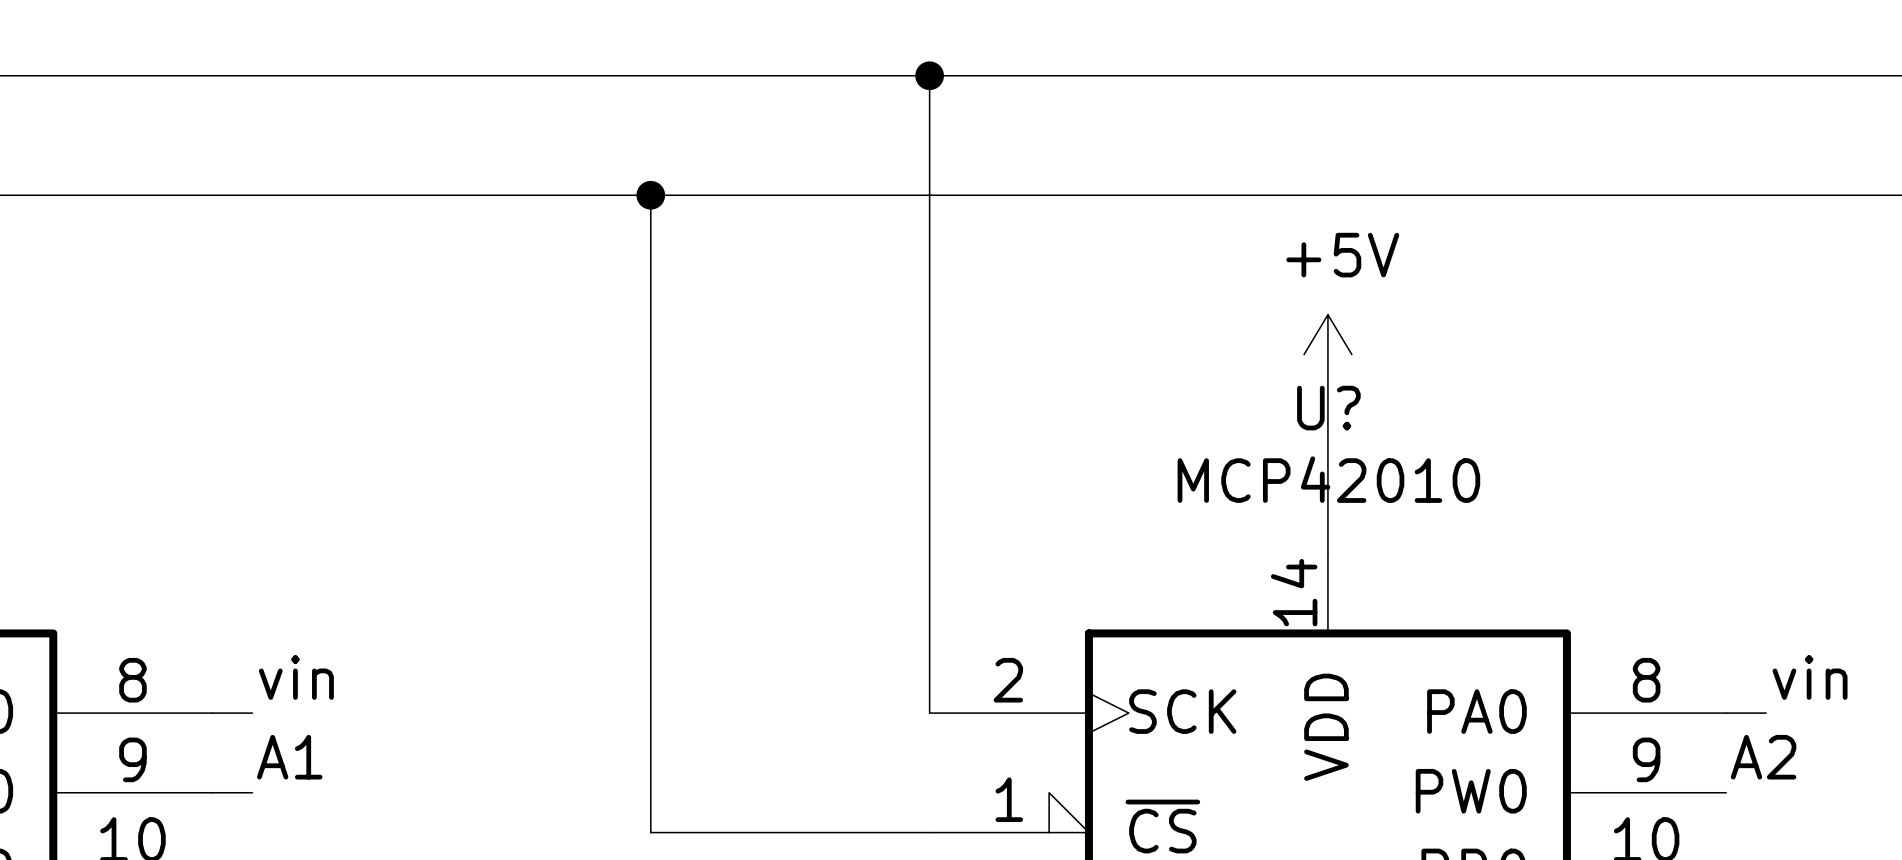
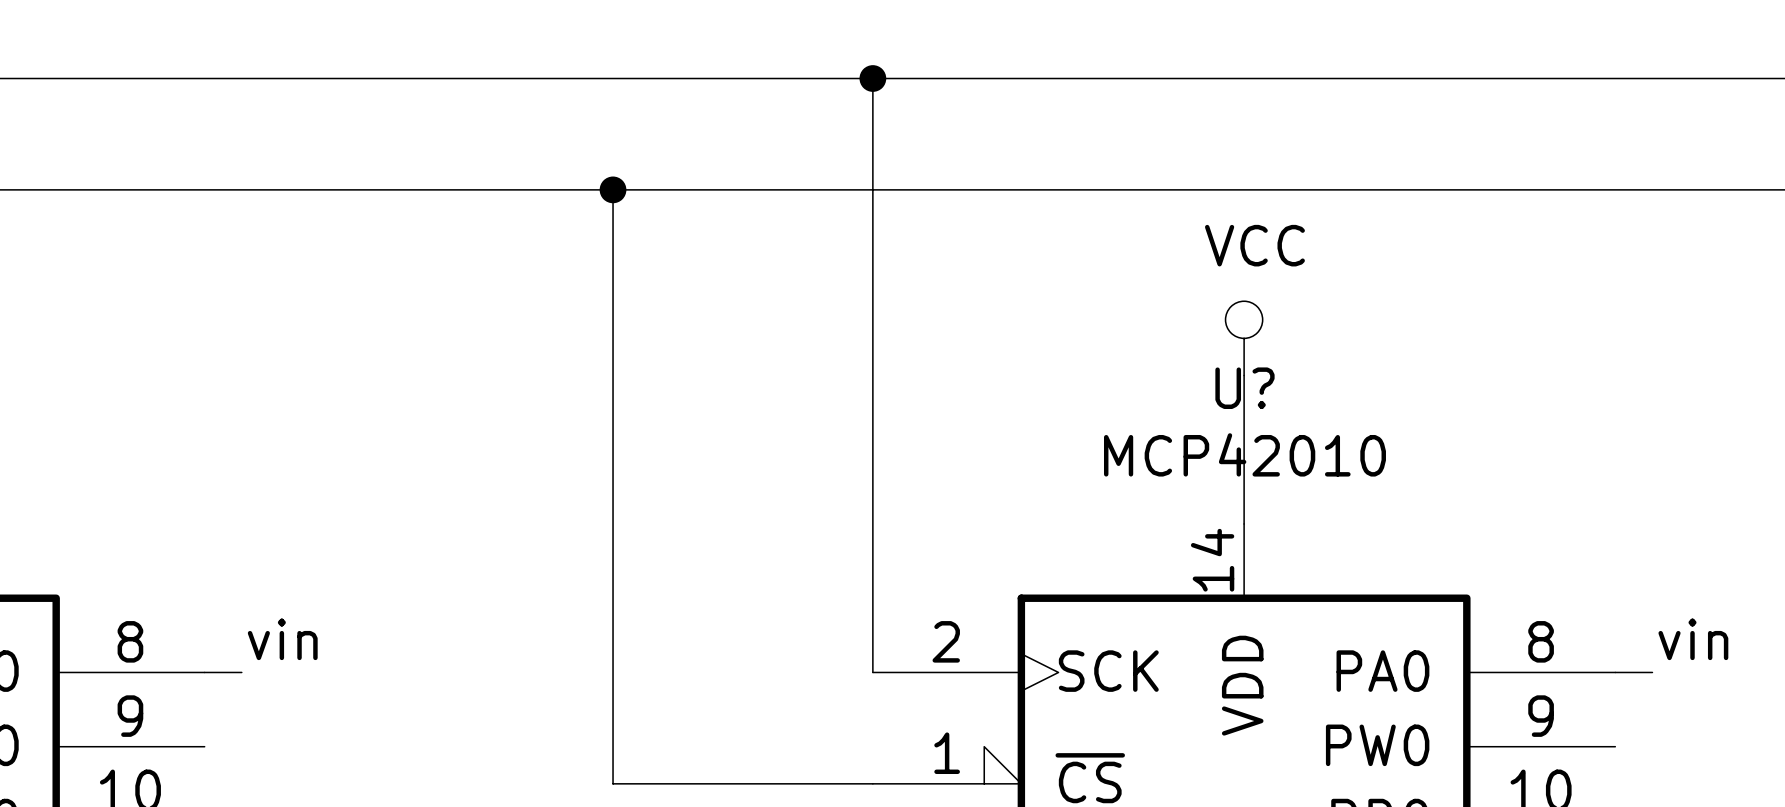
power symbol: +5V (1327, 354) -> VCC (1244, 338)
label: A1 (289, 757) -> none
label: A2 (1763, 757) -> none
wire: (212, 792) (252, 792) -> none

